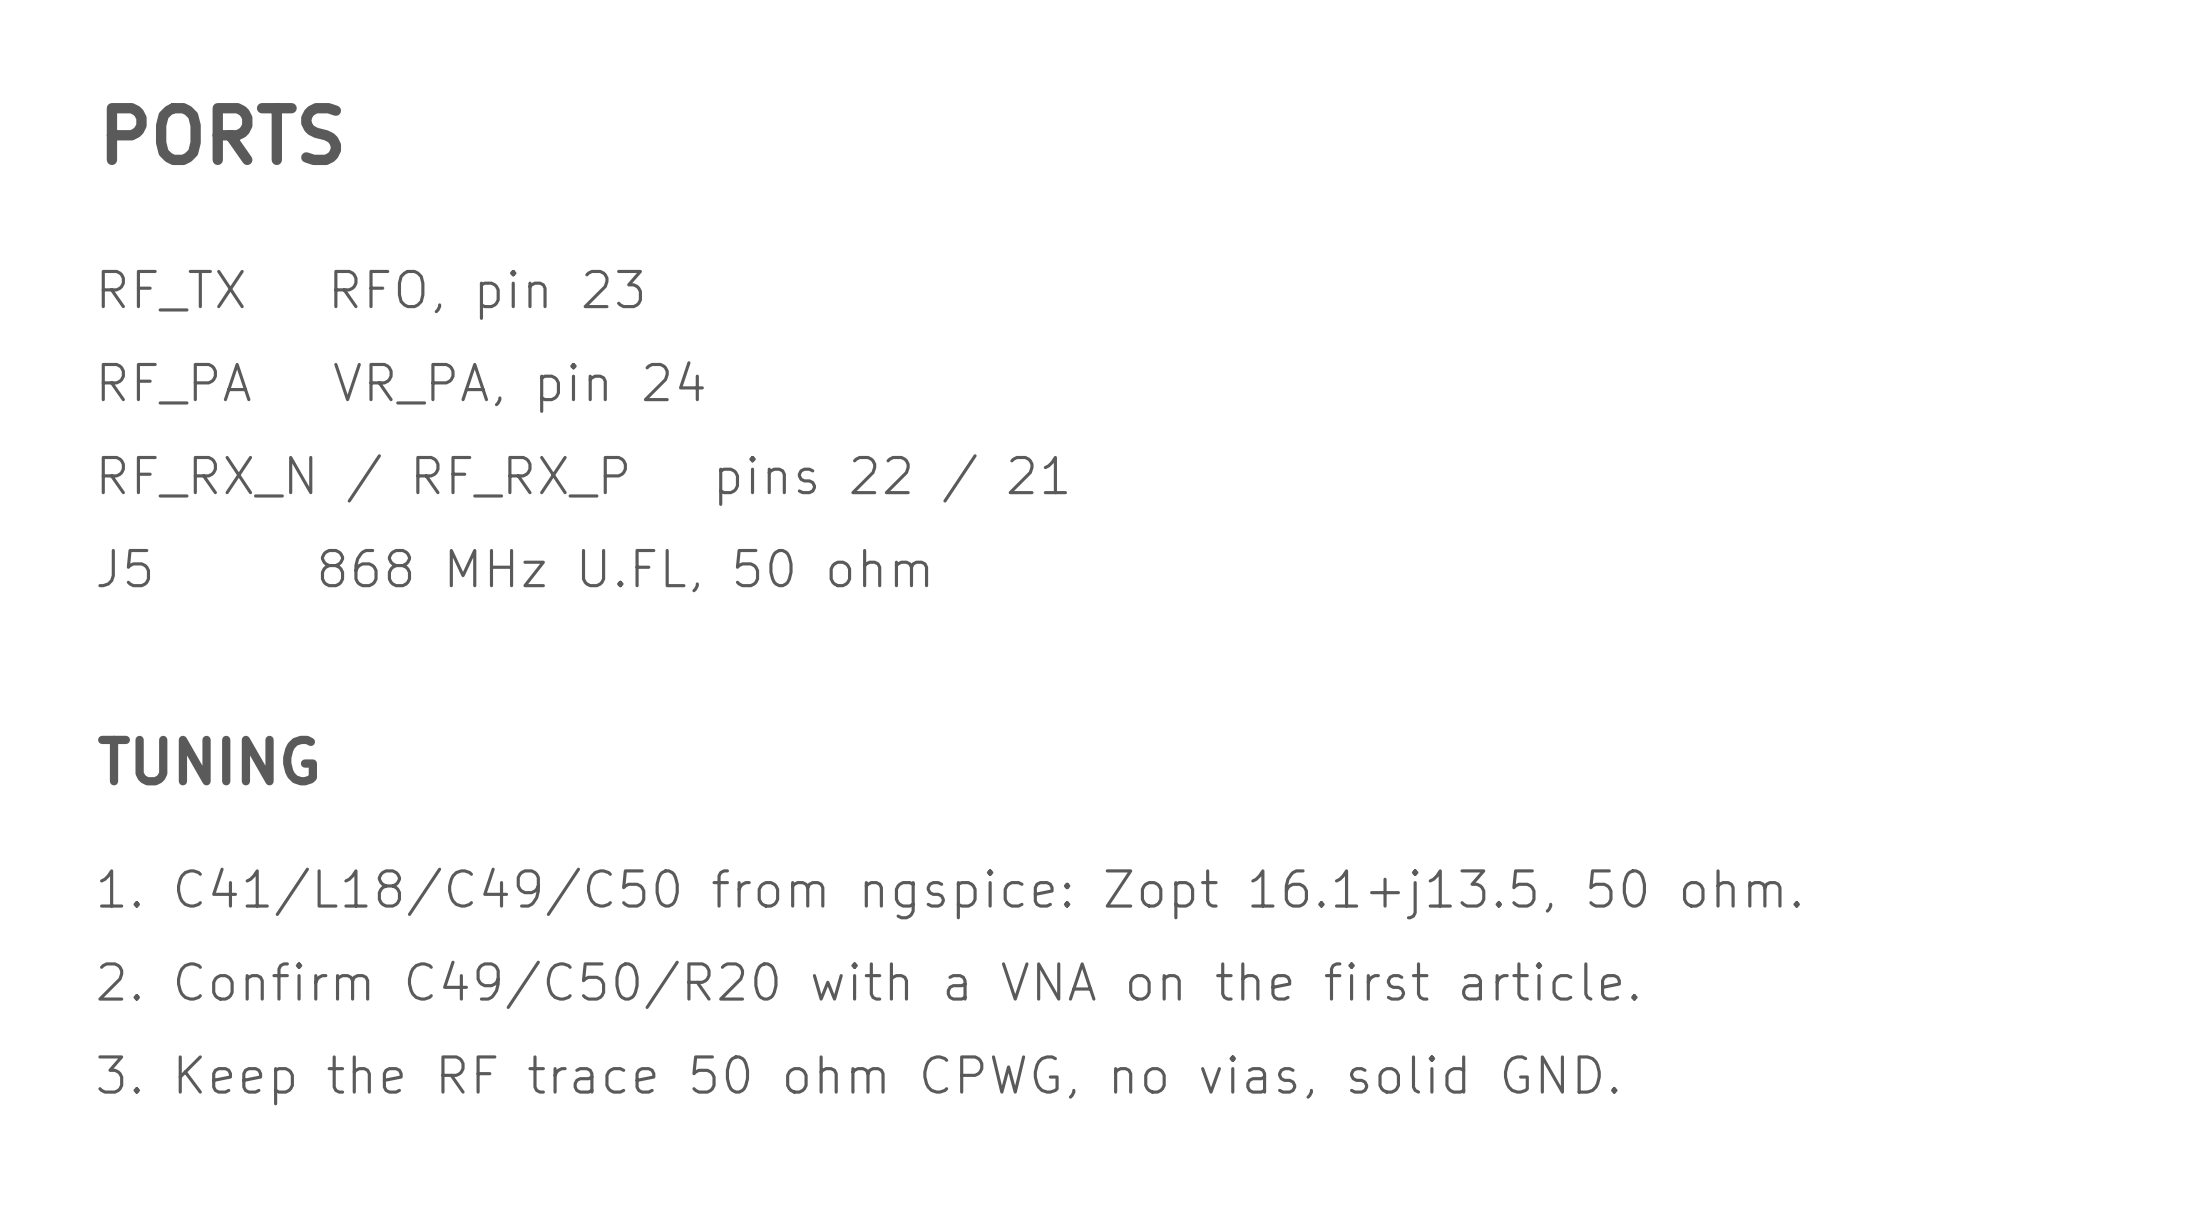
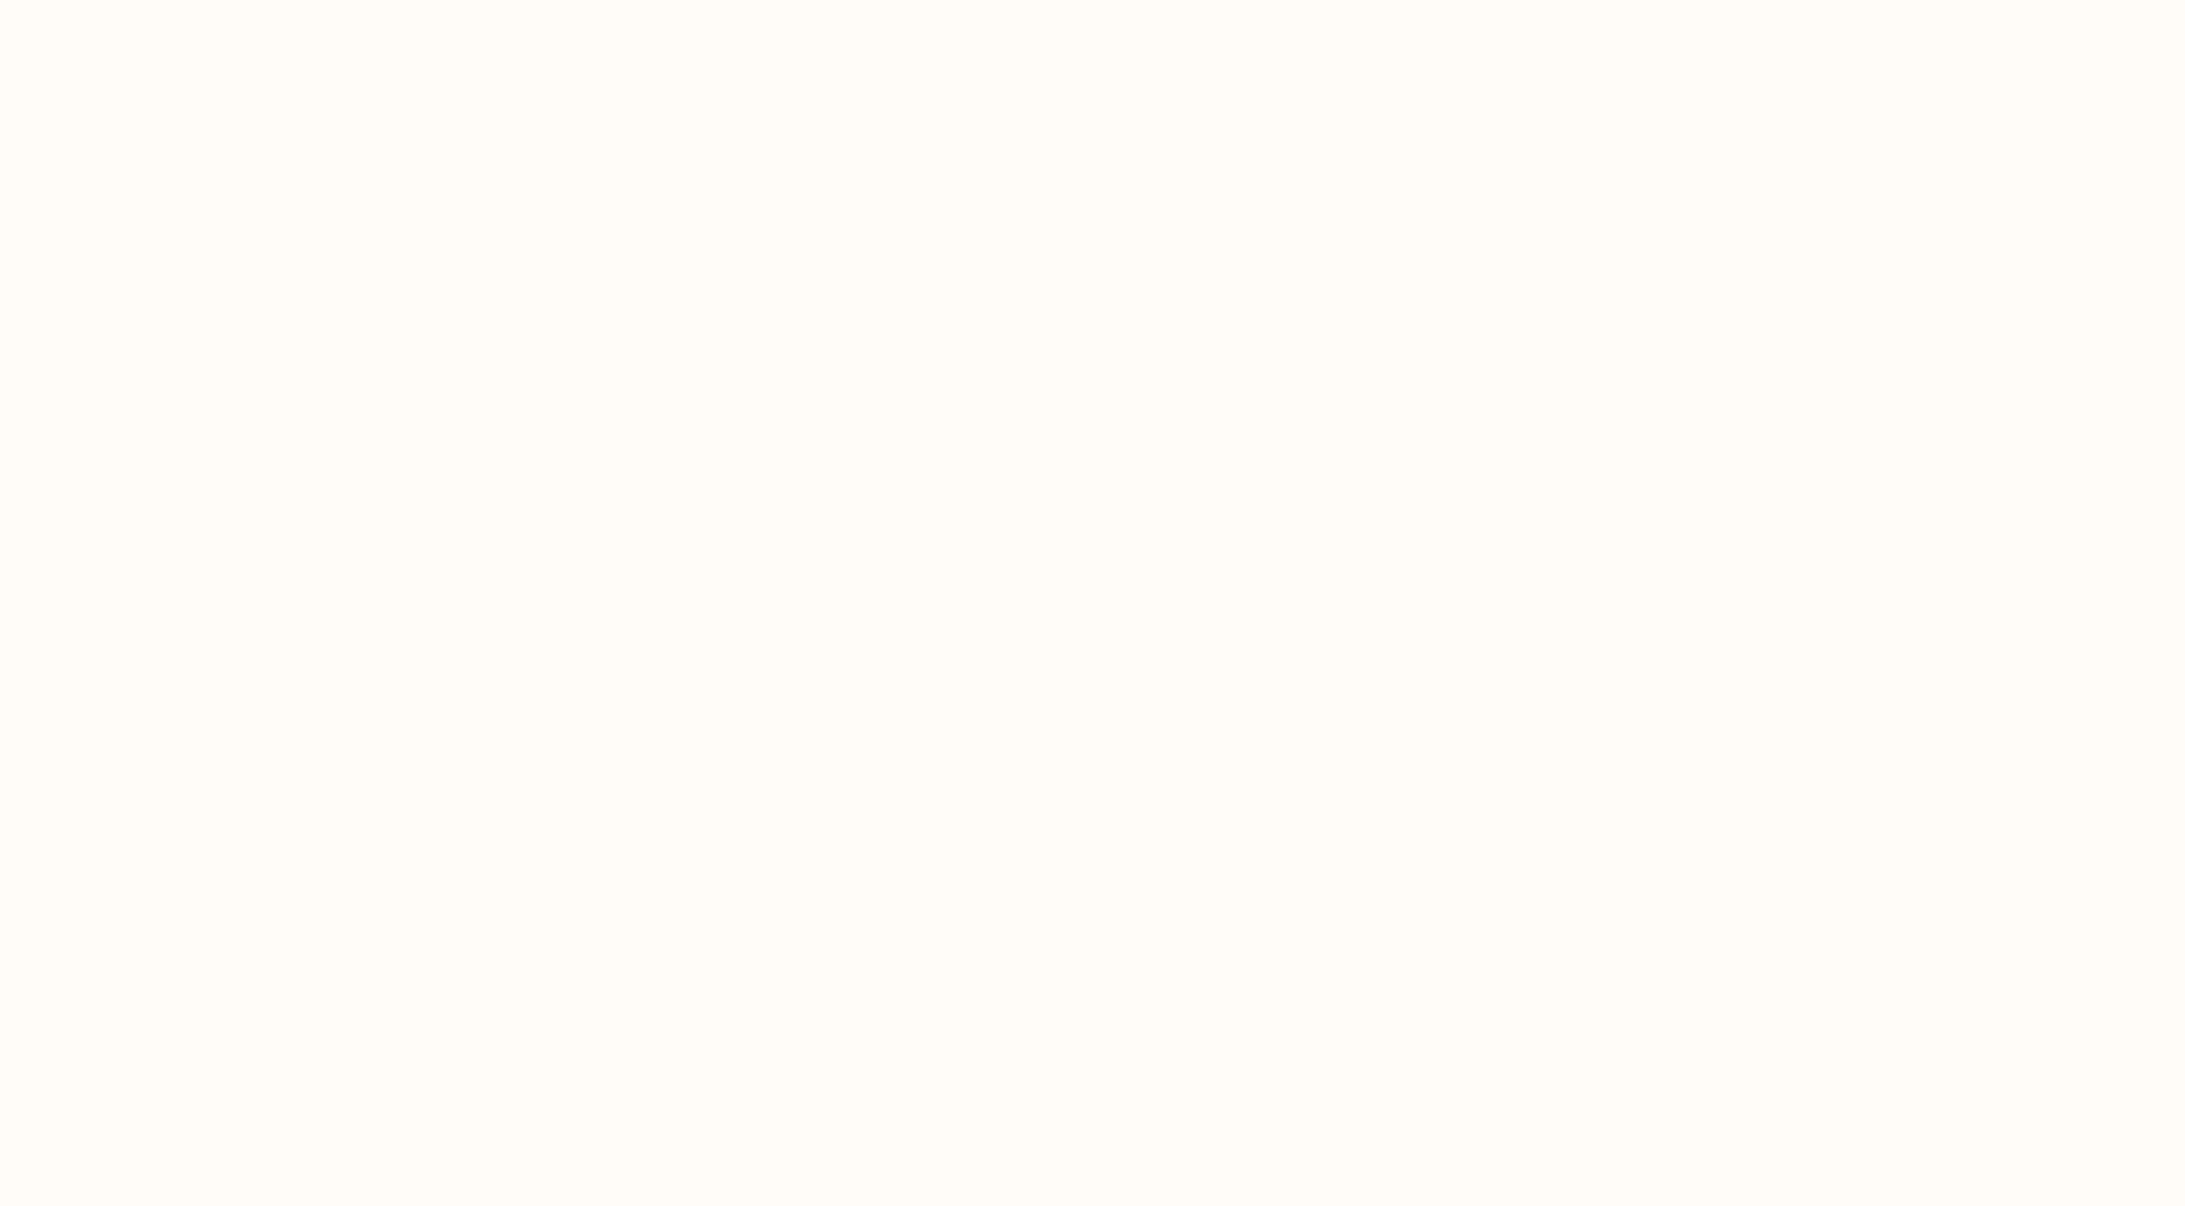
text: PORTS (223, 134) -> none
text: RF_TX RFO, pin 23 (371, 294) -> none
text: RF_PA VR_PA, pin 24 (402, 387) -> none
text: RF_RX_N / RF_RX_P pins 22 / 21 (584, 480) -> none
text: J5 868 MHz U.FL, 50 ohm (513, 570) -> none
text: TUNING (207, 760) -> none
text: 1. C41/L18/C49/C50 from ngspice: Zopt 16.1+j13.5, 50 ohm. (949, 893) -> none
text: 2. Confirm C49/C50/R20 with a VNA on the first article. (867, 984) -> none
text: 3. Keep the RF trace 50 ohm CPWG, no vias, solid GND. (857, 1080) -> none

